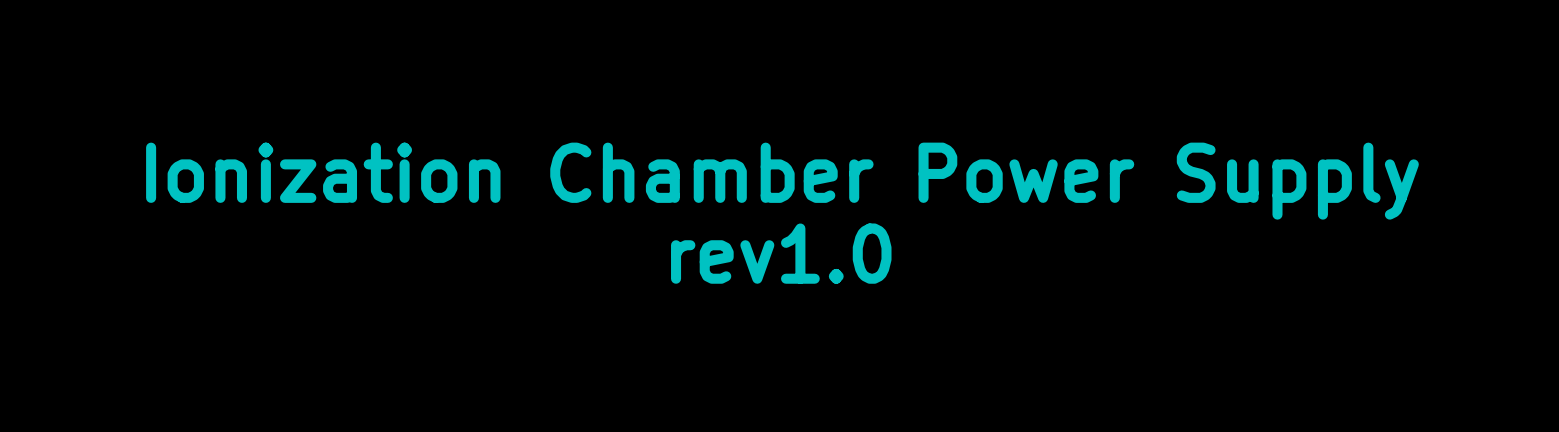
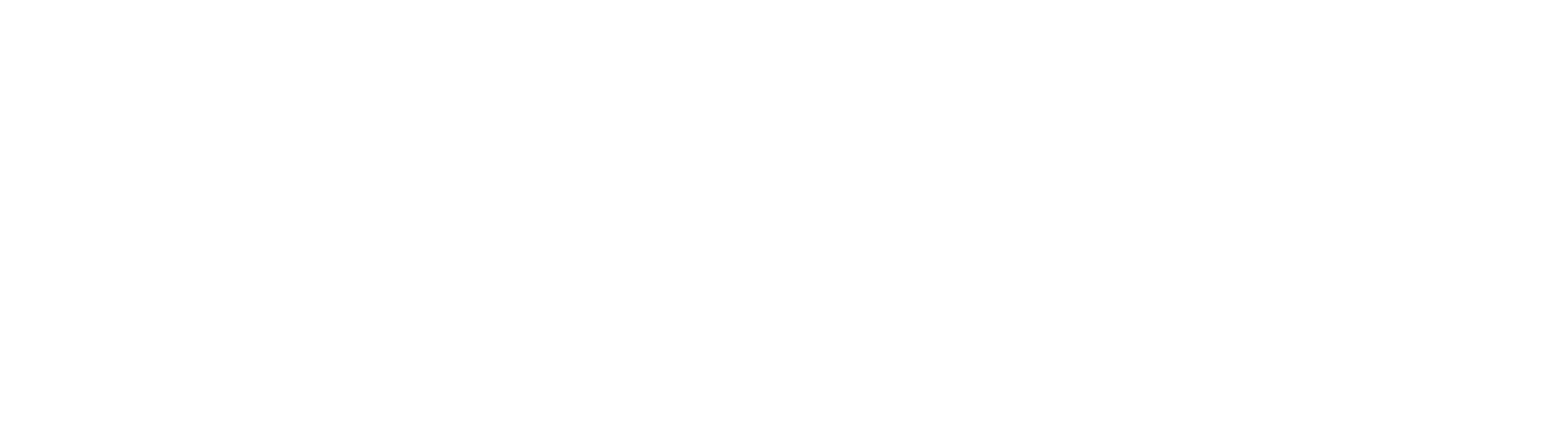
text: Ionization Chamber Power Supply (782, 181) -> none
text: rev1.0 (781, 253) -> none

